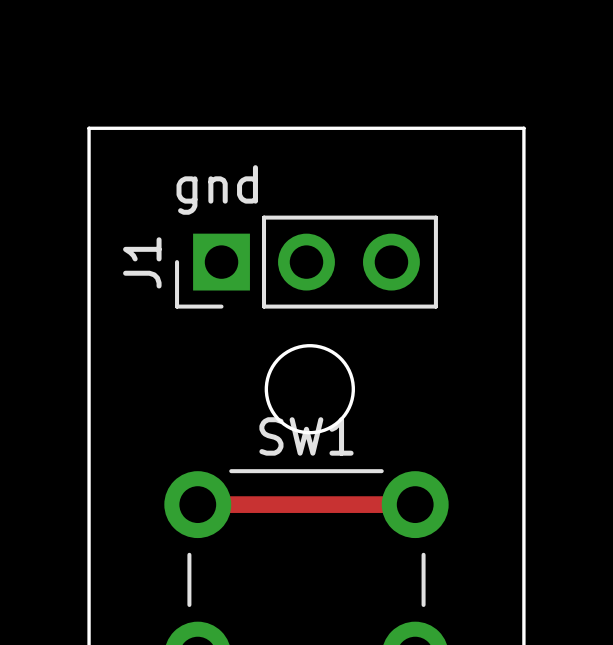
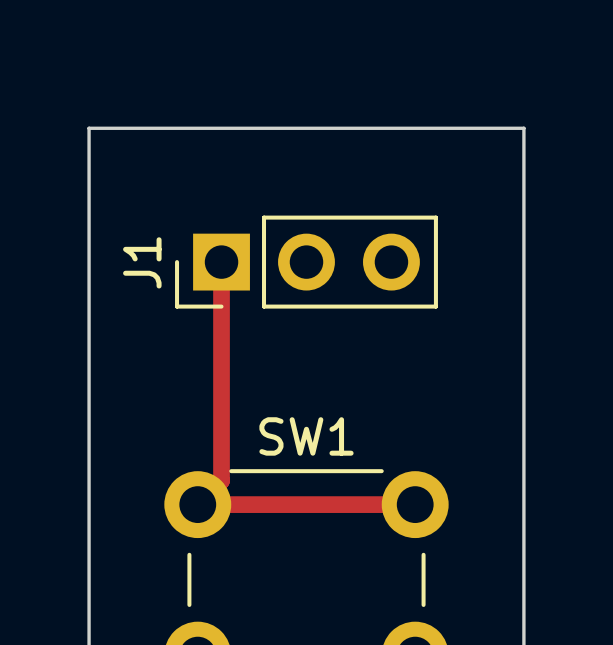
text: gnd (217, 189) -> none
track: none -> (221, 262) (221, 480) (197, 504)
round board edge: [264, 344, 355, 435] -> none

